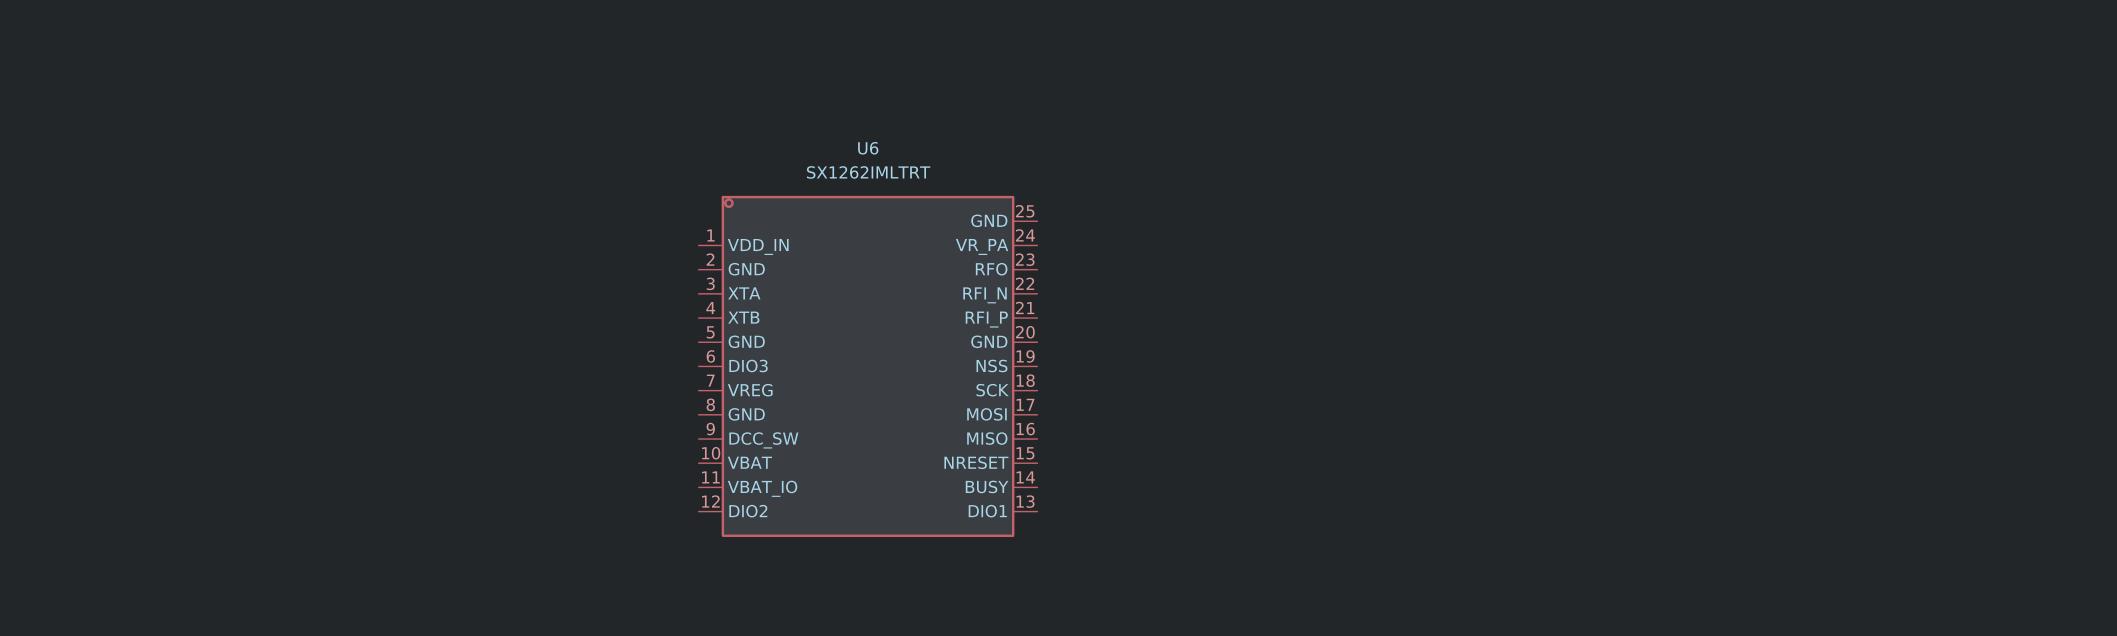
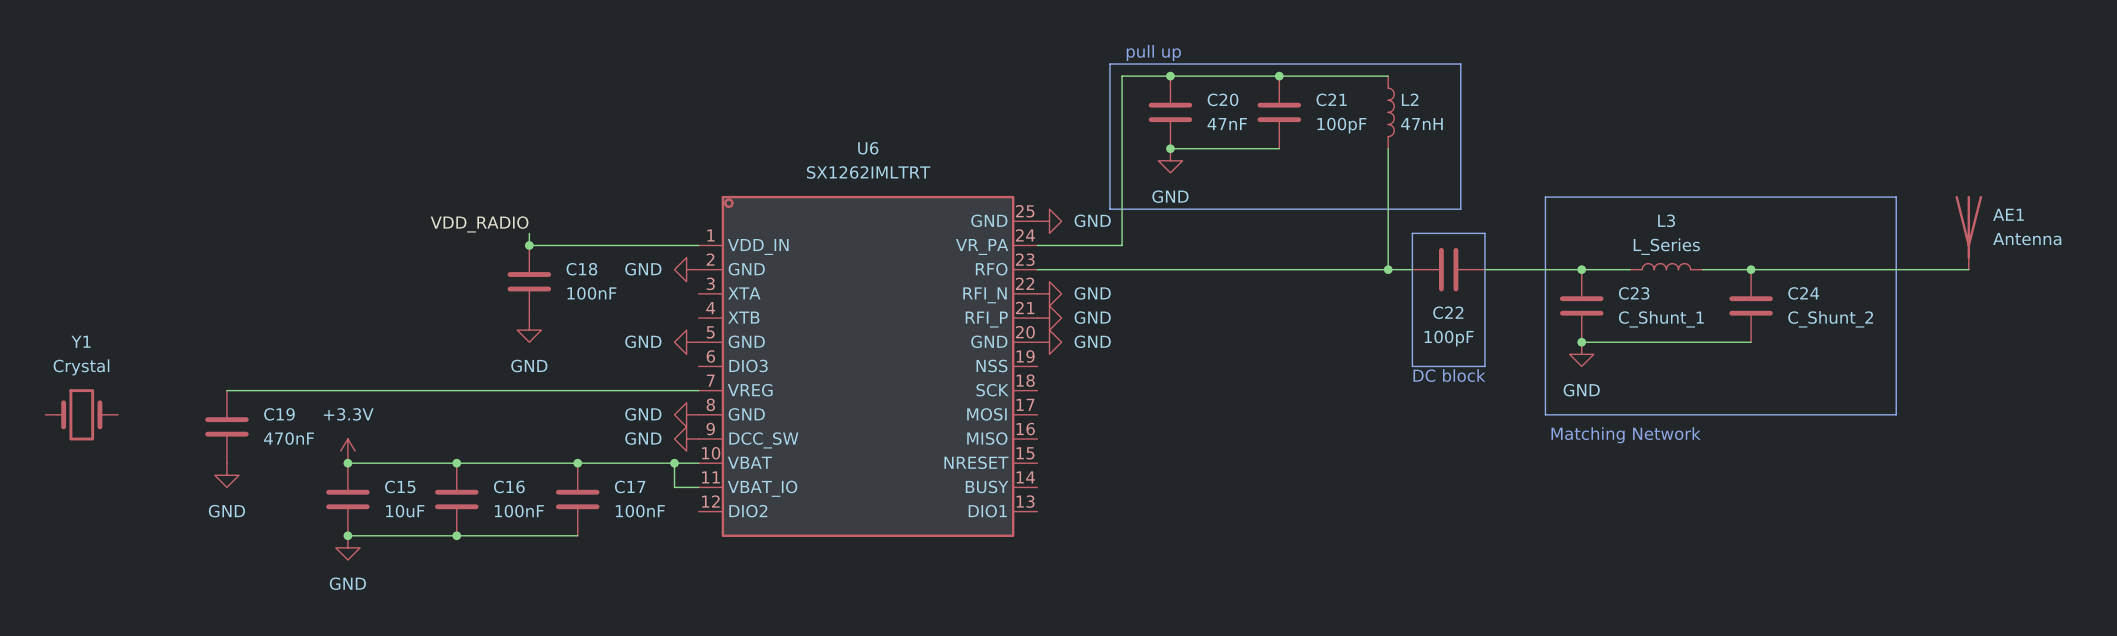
text: none -> pull up (1153, 52)
line: none -> (1109, 64) (1460, 64) (1460, 209) (1109, 209) (1109, 64)
junction: none -> (1170, 76)
junction: none -> (1279, 76)
wire: none -> (1388, 76) (1122, 76) (1122, 245) (1037, 245)
C20: none -> 47nF (1170, 112)
C21: none -> 100pF (1279, 112)
L2: none -> 47nH (1391, 112)
wire: none -> (1170, 148) (1279, 148)
junction: none -> (1170, 148)
wire: none -> (1388, 148) (1388, 269)
power symbol: none -> GND (1170, 160)
line: none -> (1545, 197) (1896, 197) (1896, 414) (1545, 414) (1545, 197)
power symbol: none -> GND (1049, 221)
label: none -> VDD_RADIO (479, 224)
AE1: none -> Antenna (1968, 232)
wire: none -> (529, 233) (529, 245) (698, 245)
line: none -> (1412, 233) (1484, 233) (1484, 366) (1412, 366) (1412, 233)
junction: none -> (529, 245)
L3: none -> L_Series (1666, 266)
power symbol: none -> GND (686, 269)
wire: none -> (1037, 269) (1412, 269)
junction: none -> (1388, 269)
C22: none -> 100pF (1448, 269)
wire: none -> (1484, 269) (1630, 269)
junction: none -> (1581, 269)
wire: none -> (1702, 269) (1968, 269)
junction: none -> (1751, 269)
C18: none -> 100nF (529, 281)
power symbol: none -> GND (1049, 293)
C23: none -> C_Shunt_1 (1581, 305)
C24: none -> C_Shunt_2 (1751, 305)
power symbol: none -> GND (1049, 318)
power symbol: none -> GND (529, 330)
power symbol: none -> GND (686, 342)
power symbol: none -> GND (1049, 342)
wire: none -> (1581, 342) (1751, 342)
junction: none -> (1581, 342)
power symbol: none -> GND (1581, 354)
text: none -> DC block (1449, 375)
wire: none -> (226, 390) (698, 390)
Y1: none -> Crystal (81, 414)
power symbol: none -> GND (686, 414)
C19: none -> 470nF (226, 426)
text: none -> Matching Network (1626, 435)
power symbol: none -> GND (686, 439)
power symbol: none -> +3.3V (347, 451)
wire: none -> (347, 463) (698, 463)
junction: none -> (347, 463)
junction: none -> (456, 463)
junction: none -> (577, 463)
wire: none -> (674, 463) (674, 487) (698, 487)
junction: none -> (674, 463)
power symbol: none -> GND (226, 475)
C15: none -> 10uF (347, 499)
C16: none -> 100nF (456, 499)
C17: none -> 100nF (577, 499)
wire: none -> (347, 535) (577, 535)
junction: none -> (347, 535)
junction: none -> (456, 535)
power symbol: none -> GND (347, 547)

